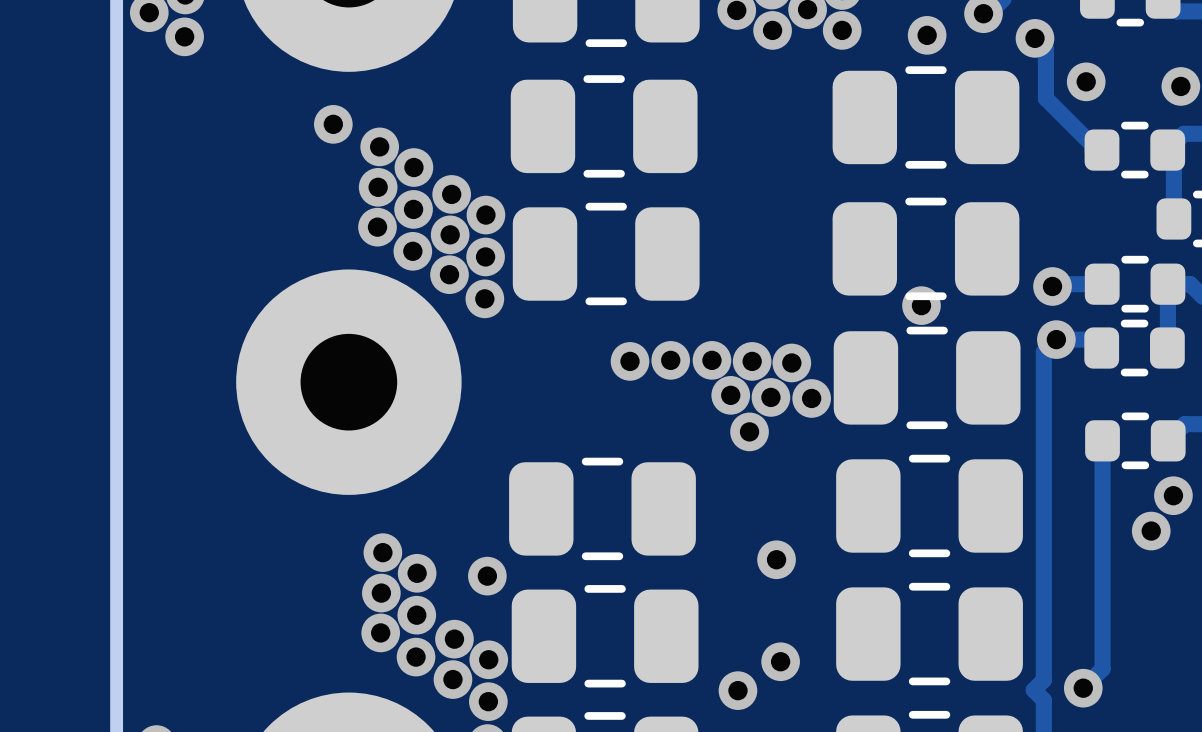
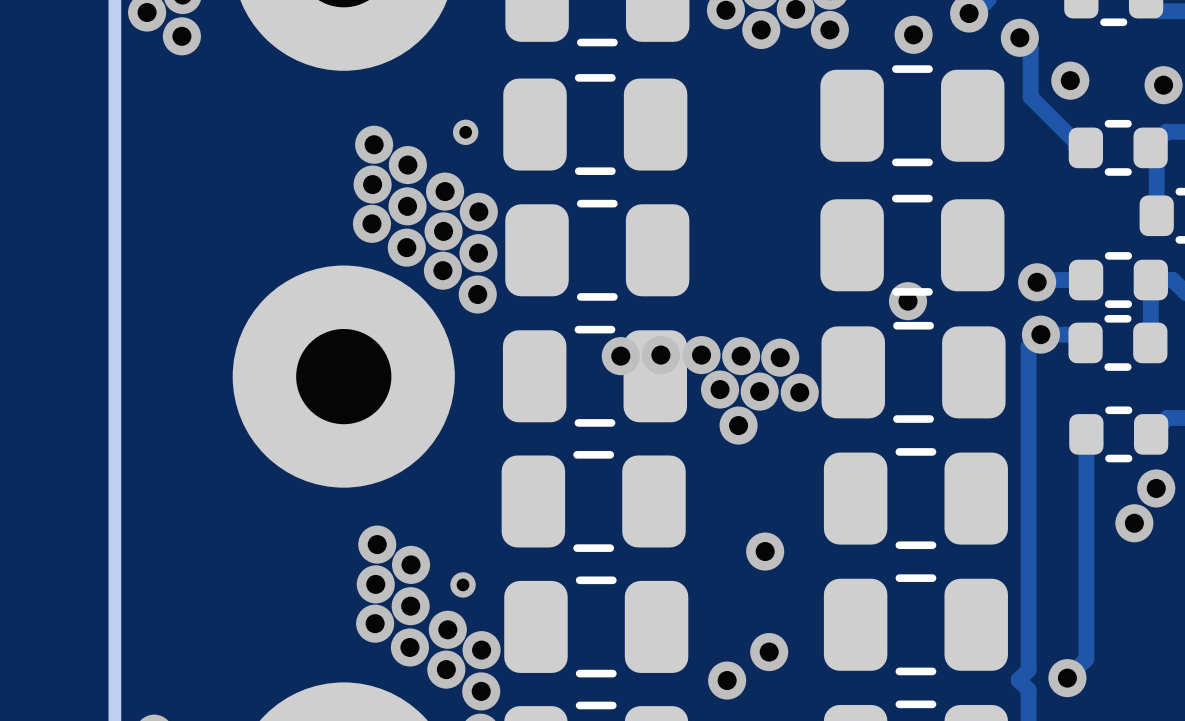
via: (333, 124) -> none
via: none -> (465, 132)
part: none -> (594, 376)
via size: [468, 556, 507, 596] -> [450, 572, 476, 598]

